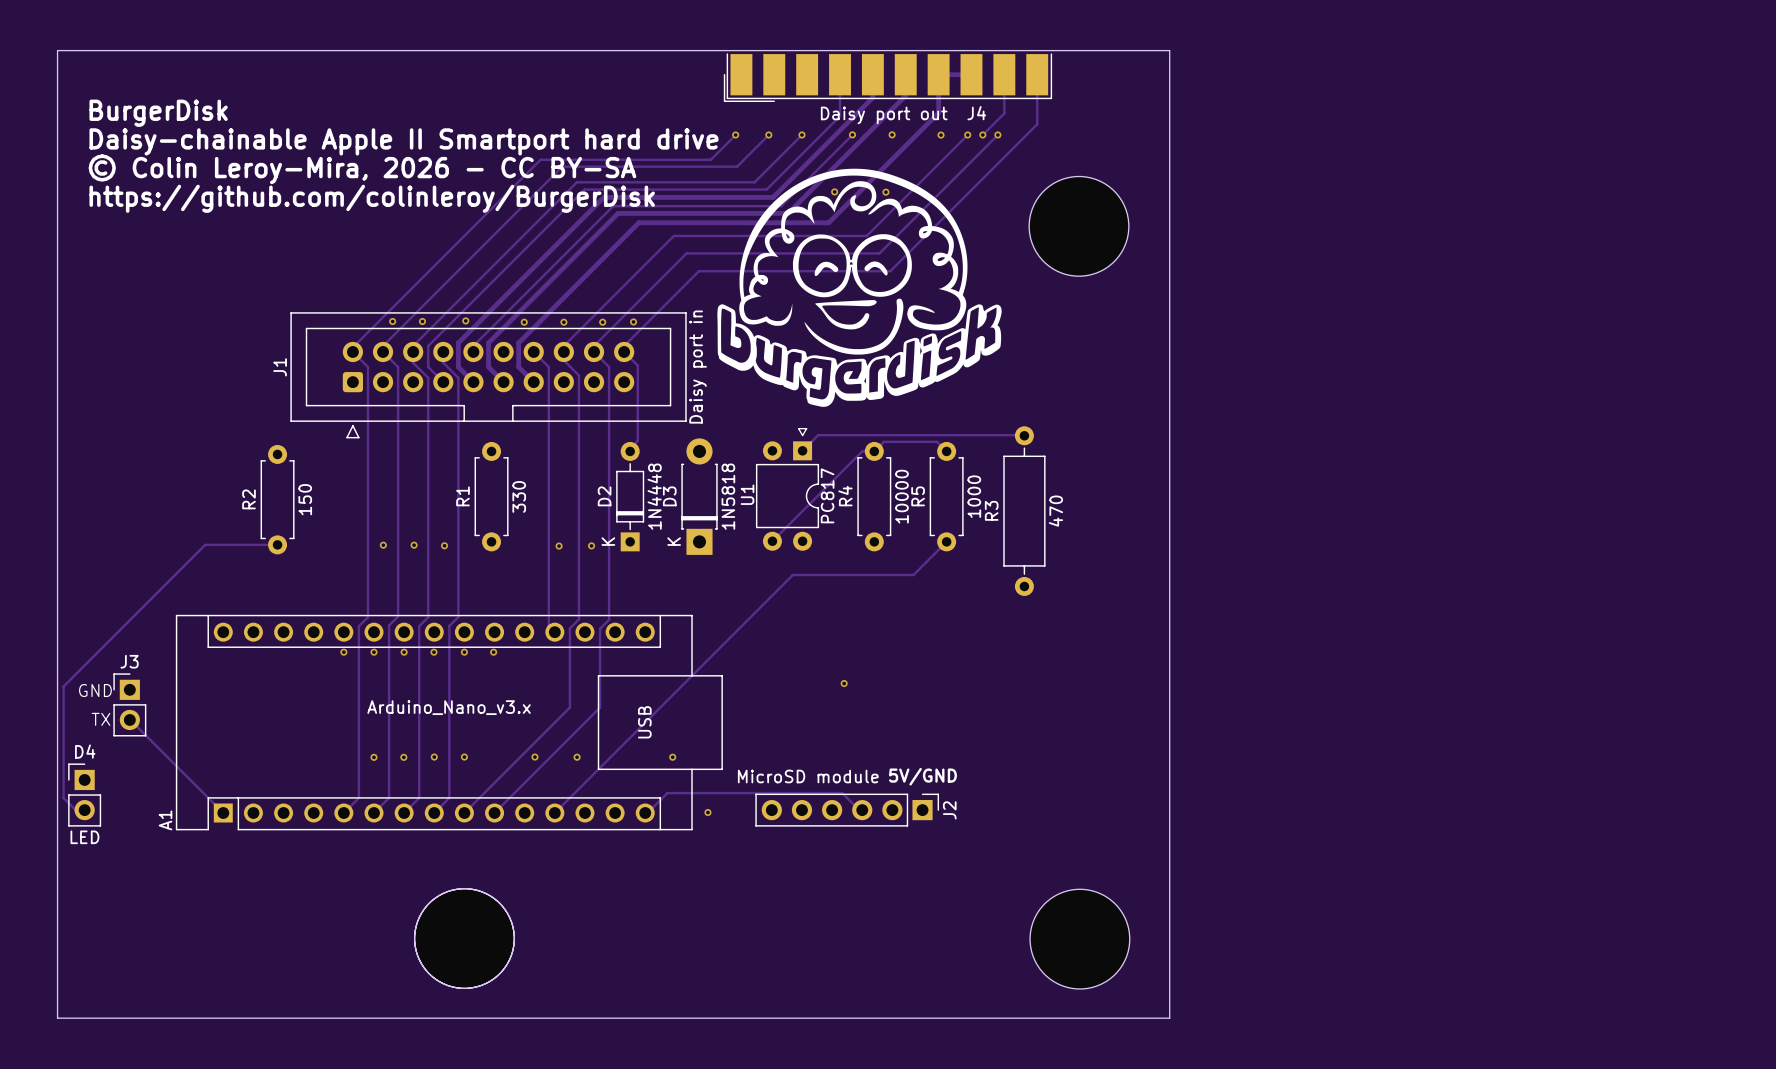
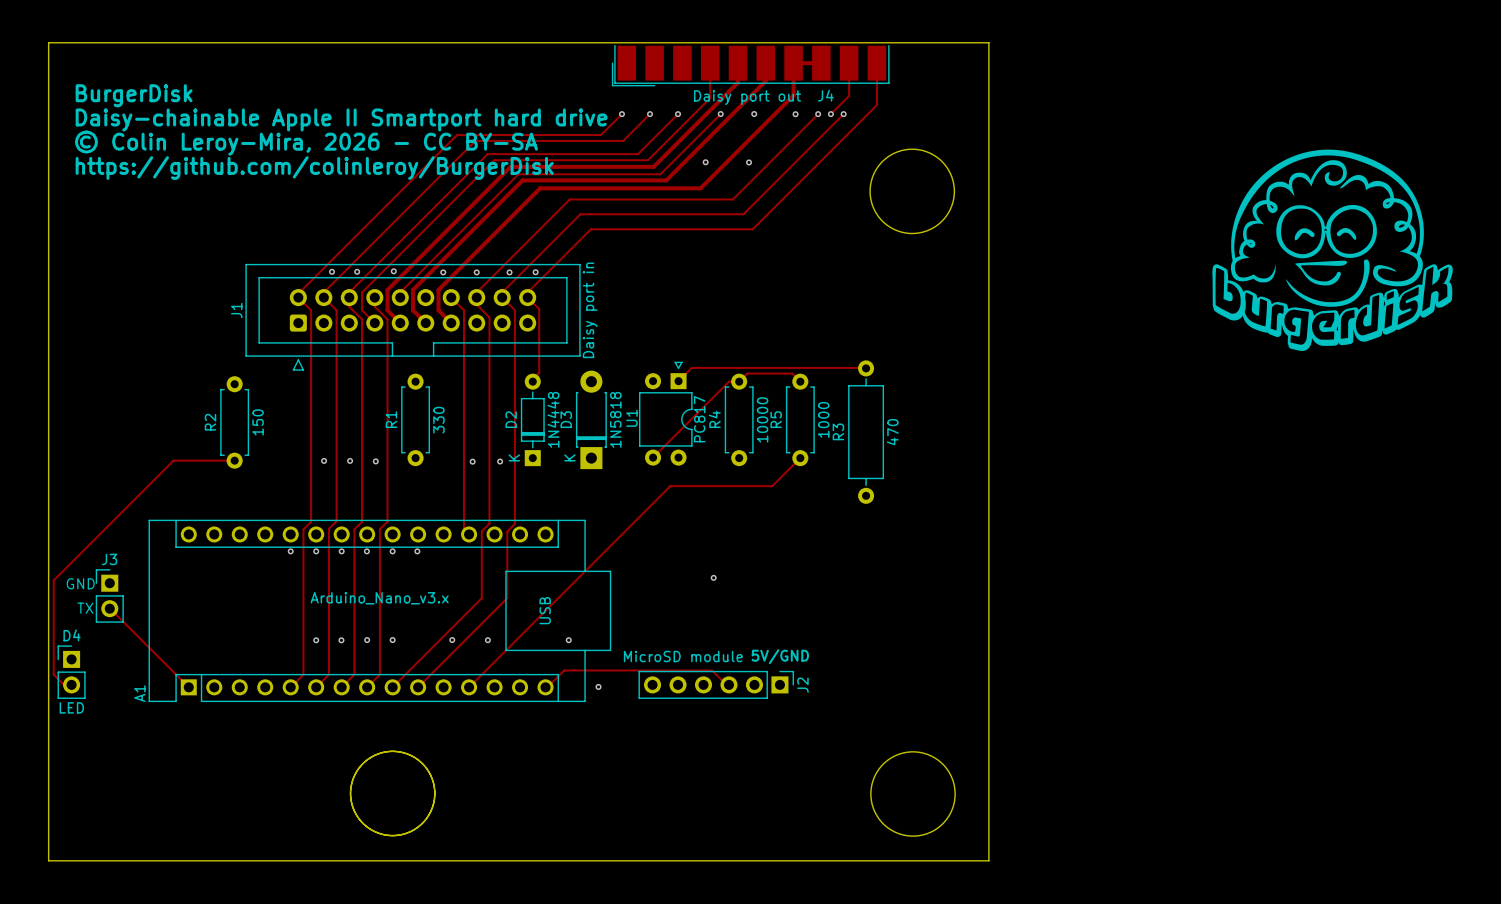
drawing: [717, 168, 1002, 407] -> none
drawing: none -> [1212, 149, 1453, 351]

